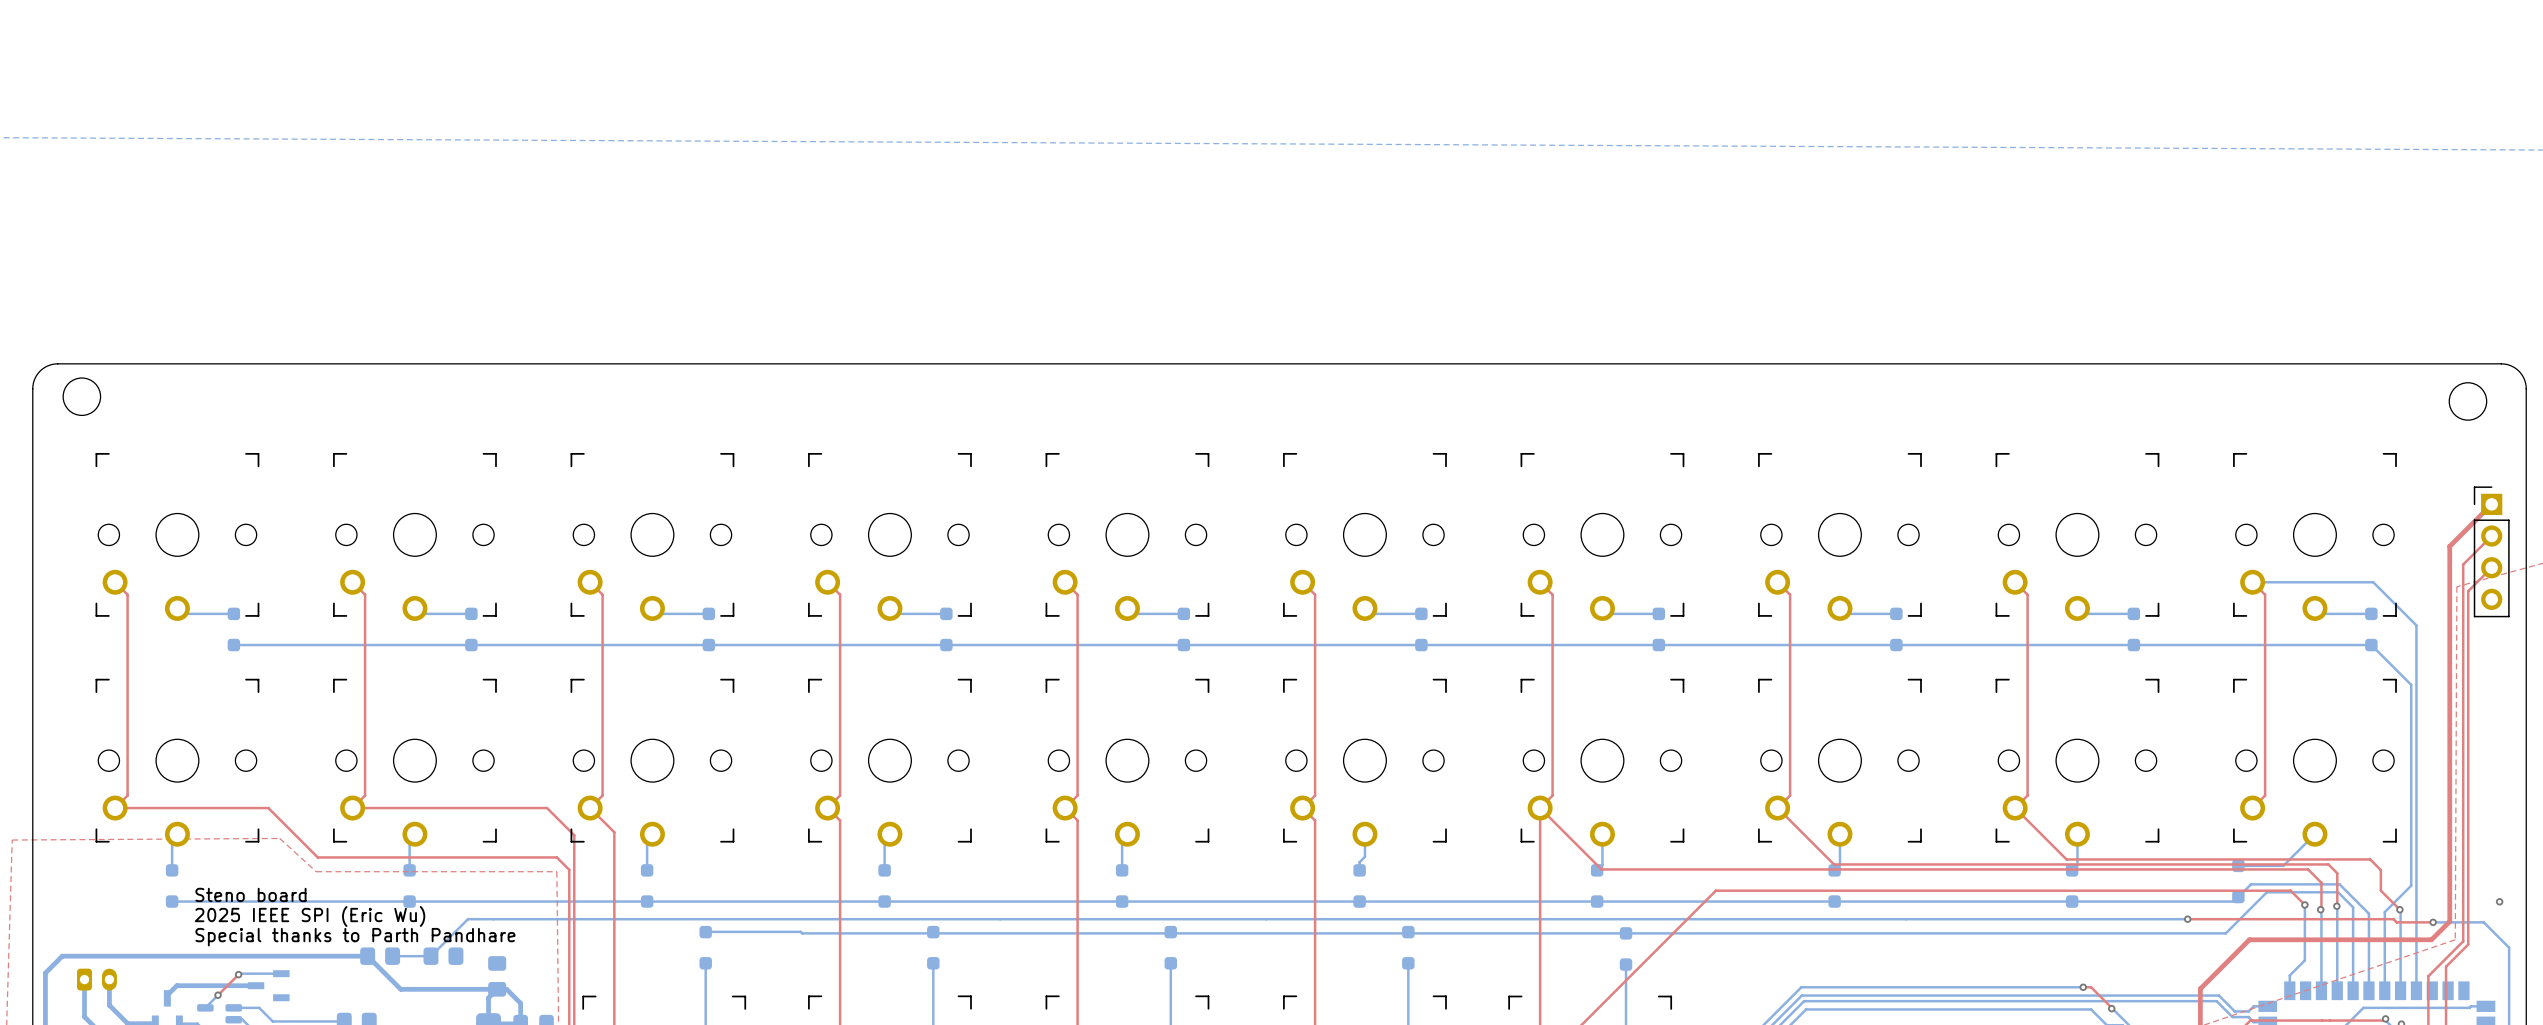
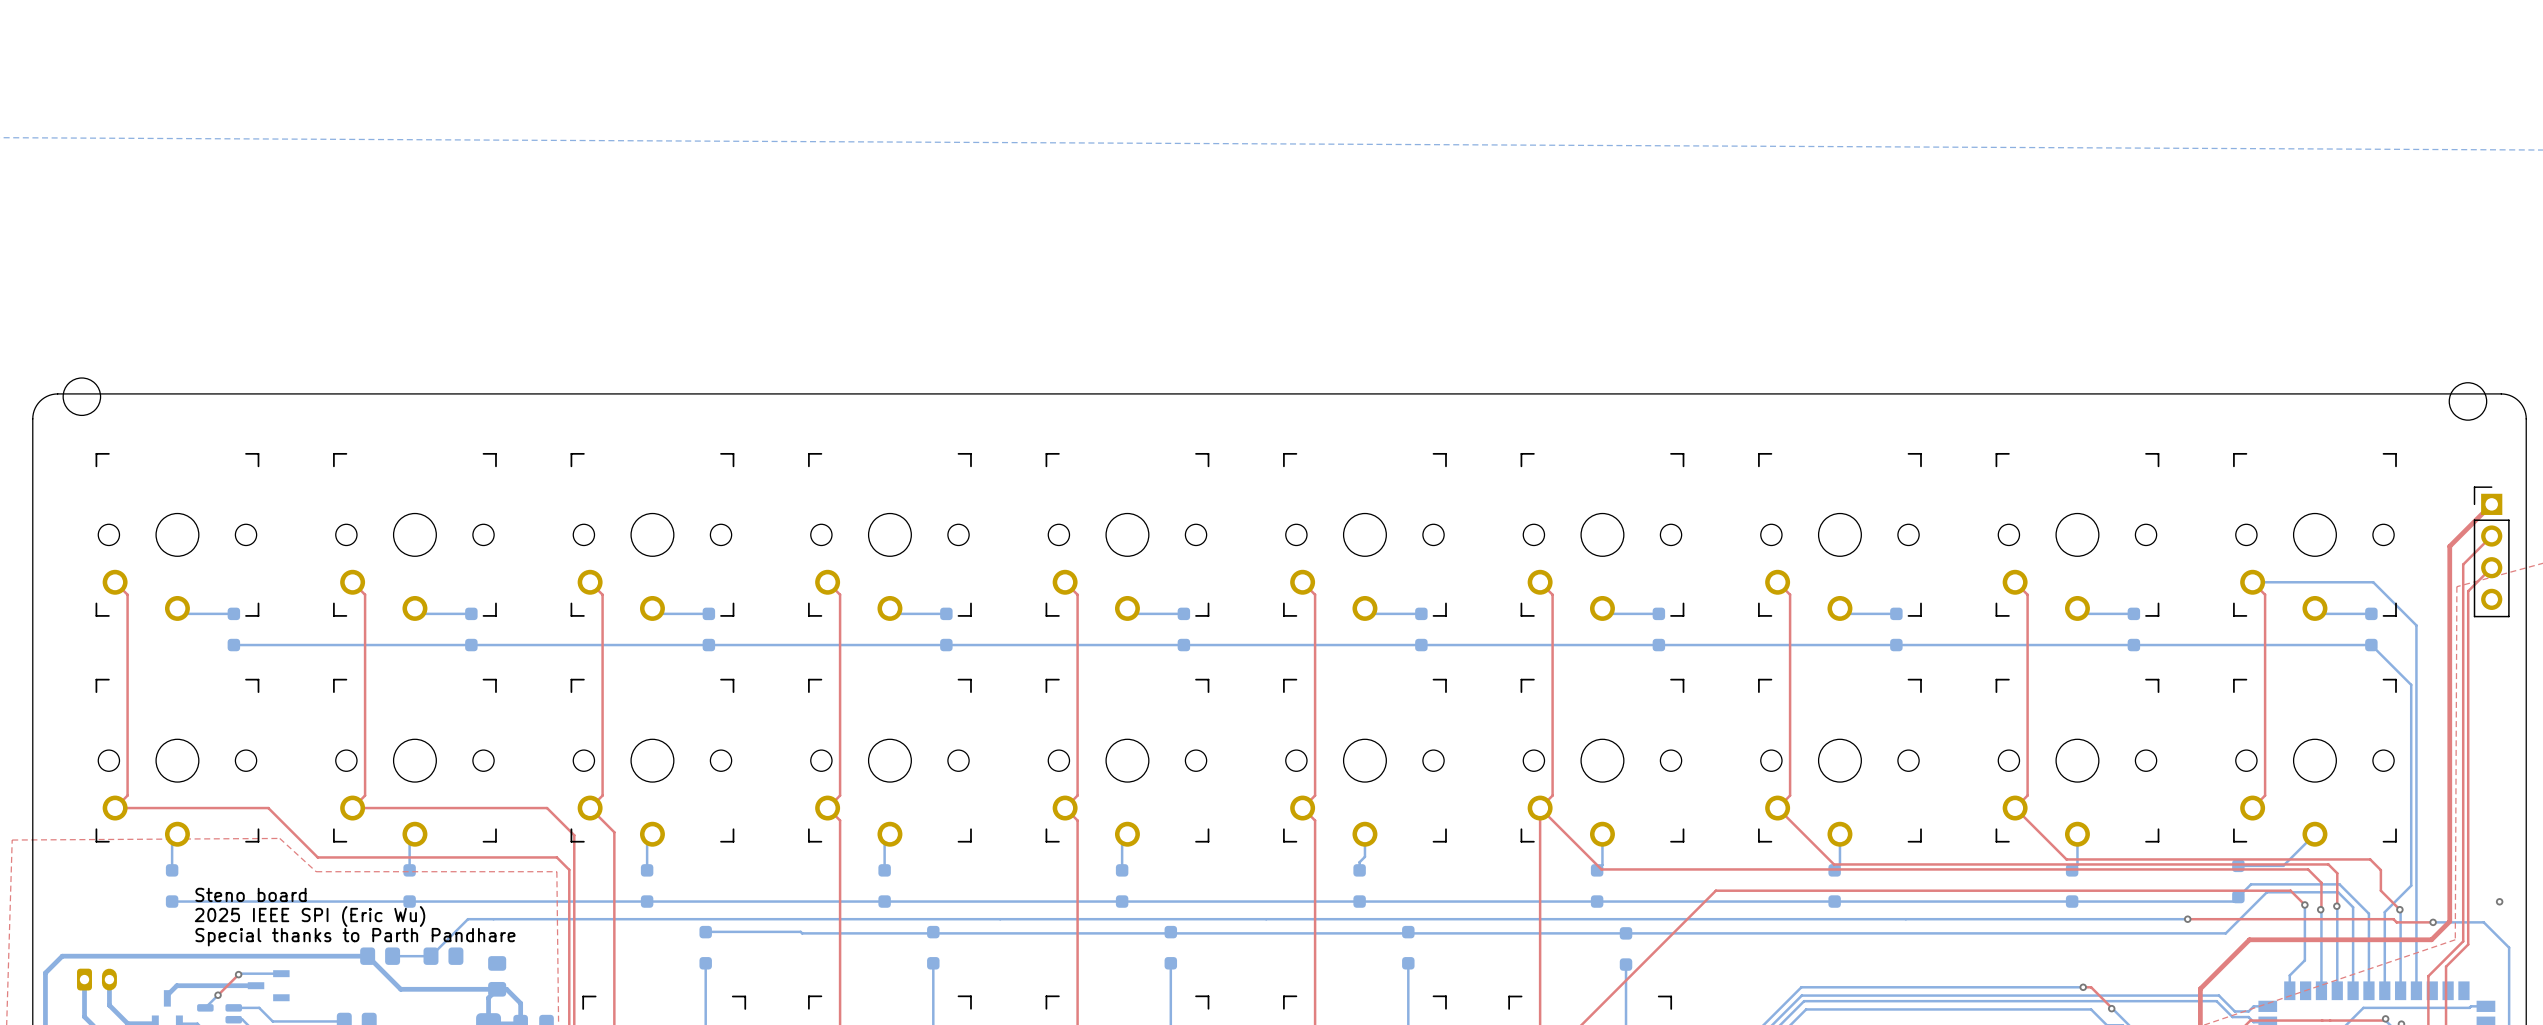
board edge: (32, 418) (32, 385) (35, 377) (44, 367) (57, 363) (2501, 363) (2514, 367) (2523, 377) (2526, 385) (2526, 418) -> (32, 418) (34, 410) (40, 401) (49, 395) (57, 393) (2501, 393) (2509, 395) (2518, 401) (2523, 408) (2526, 418)

